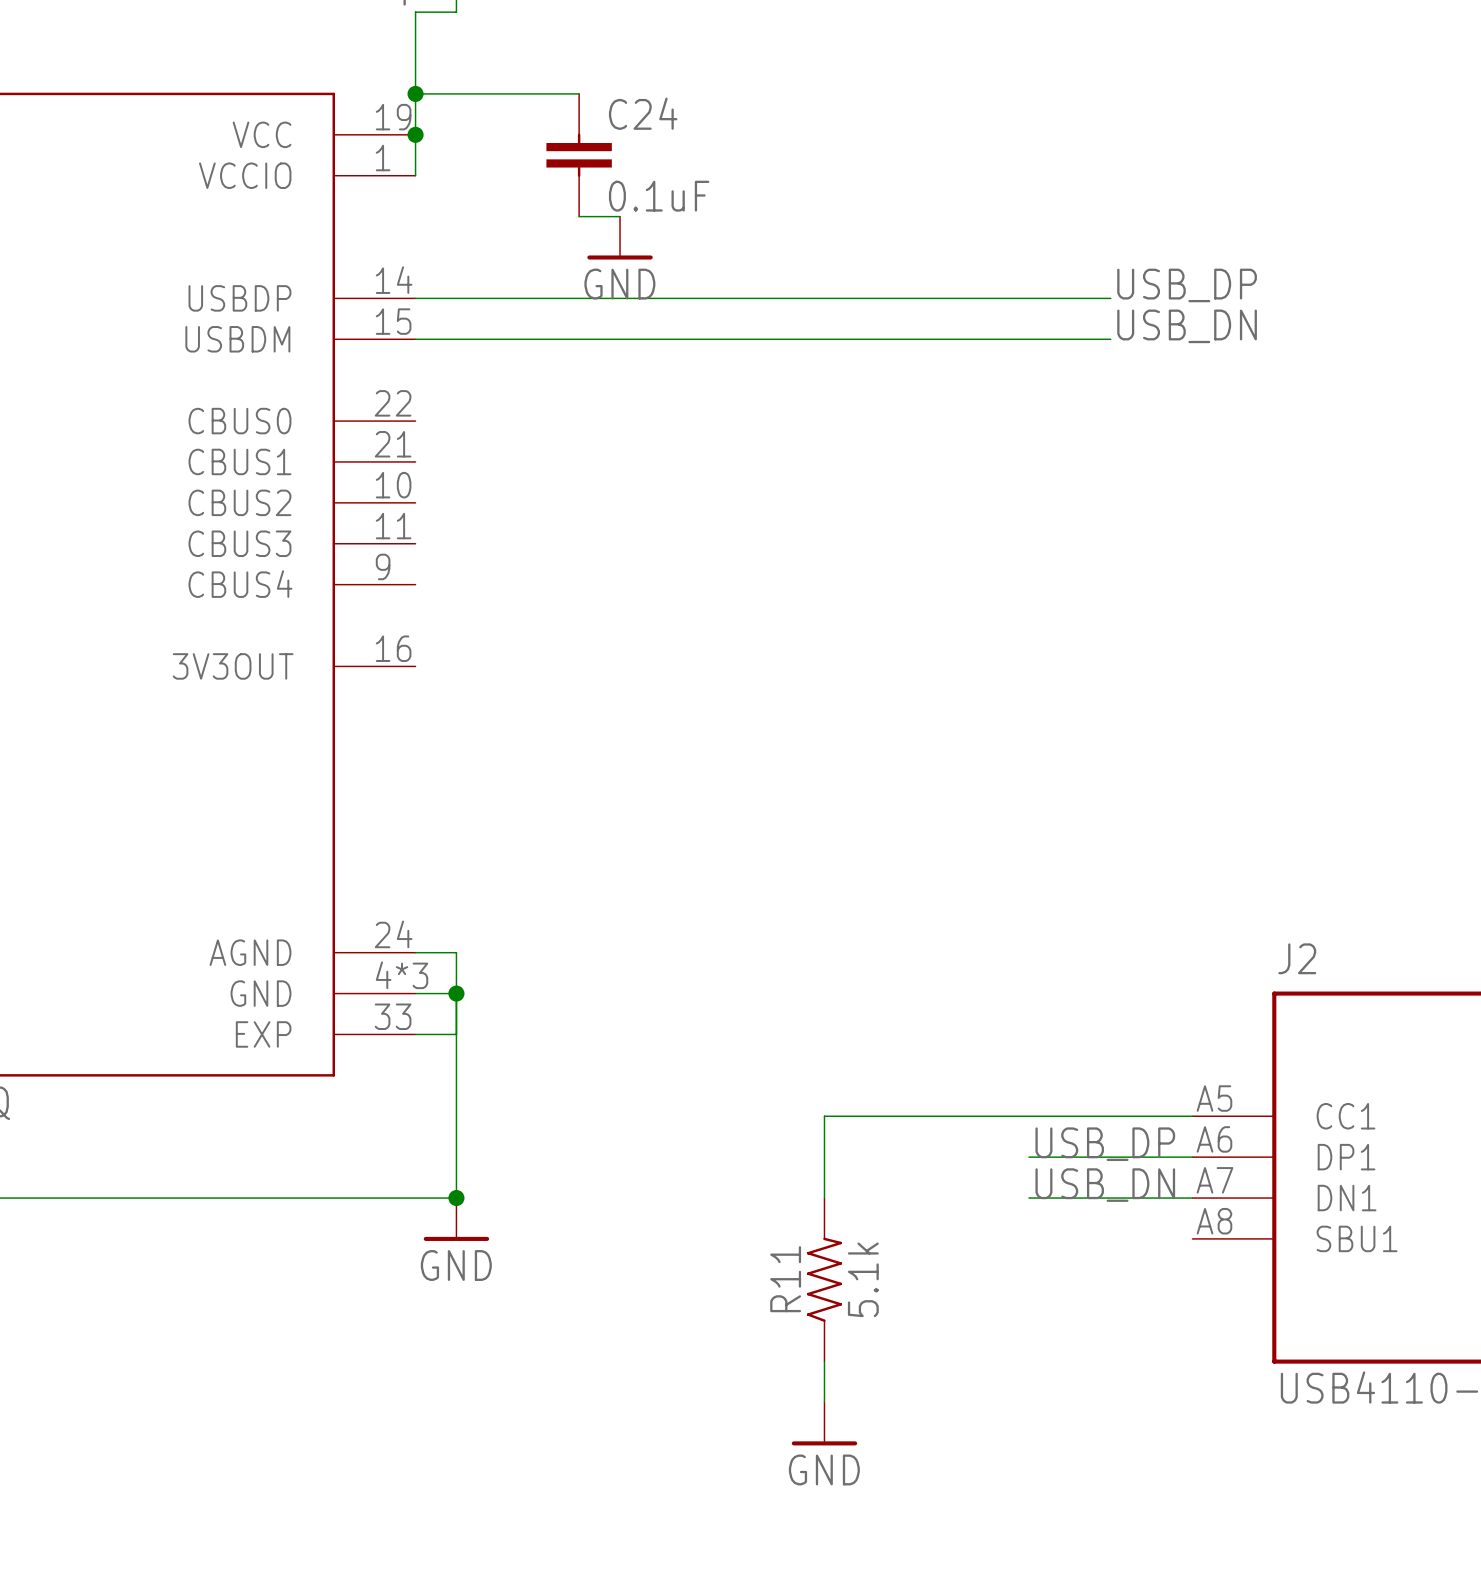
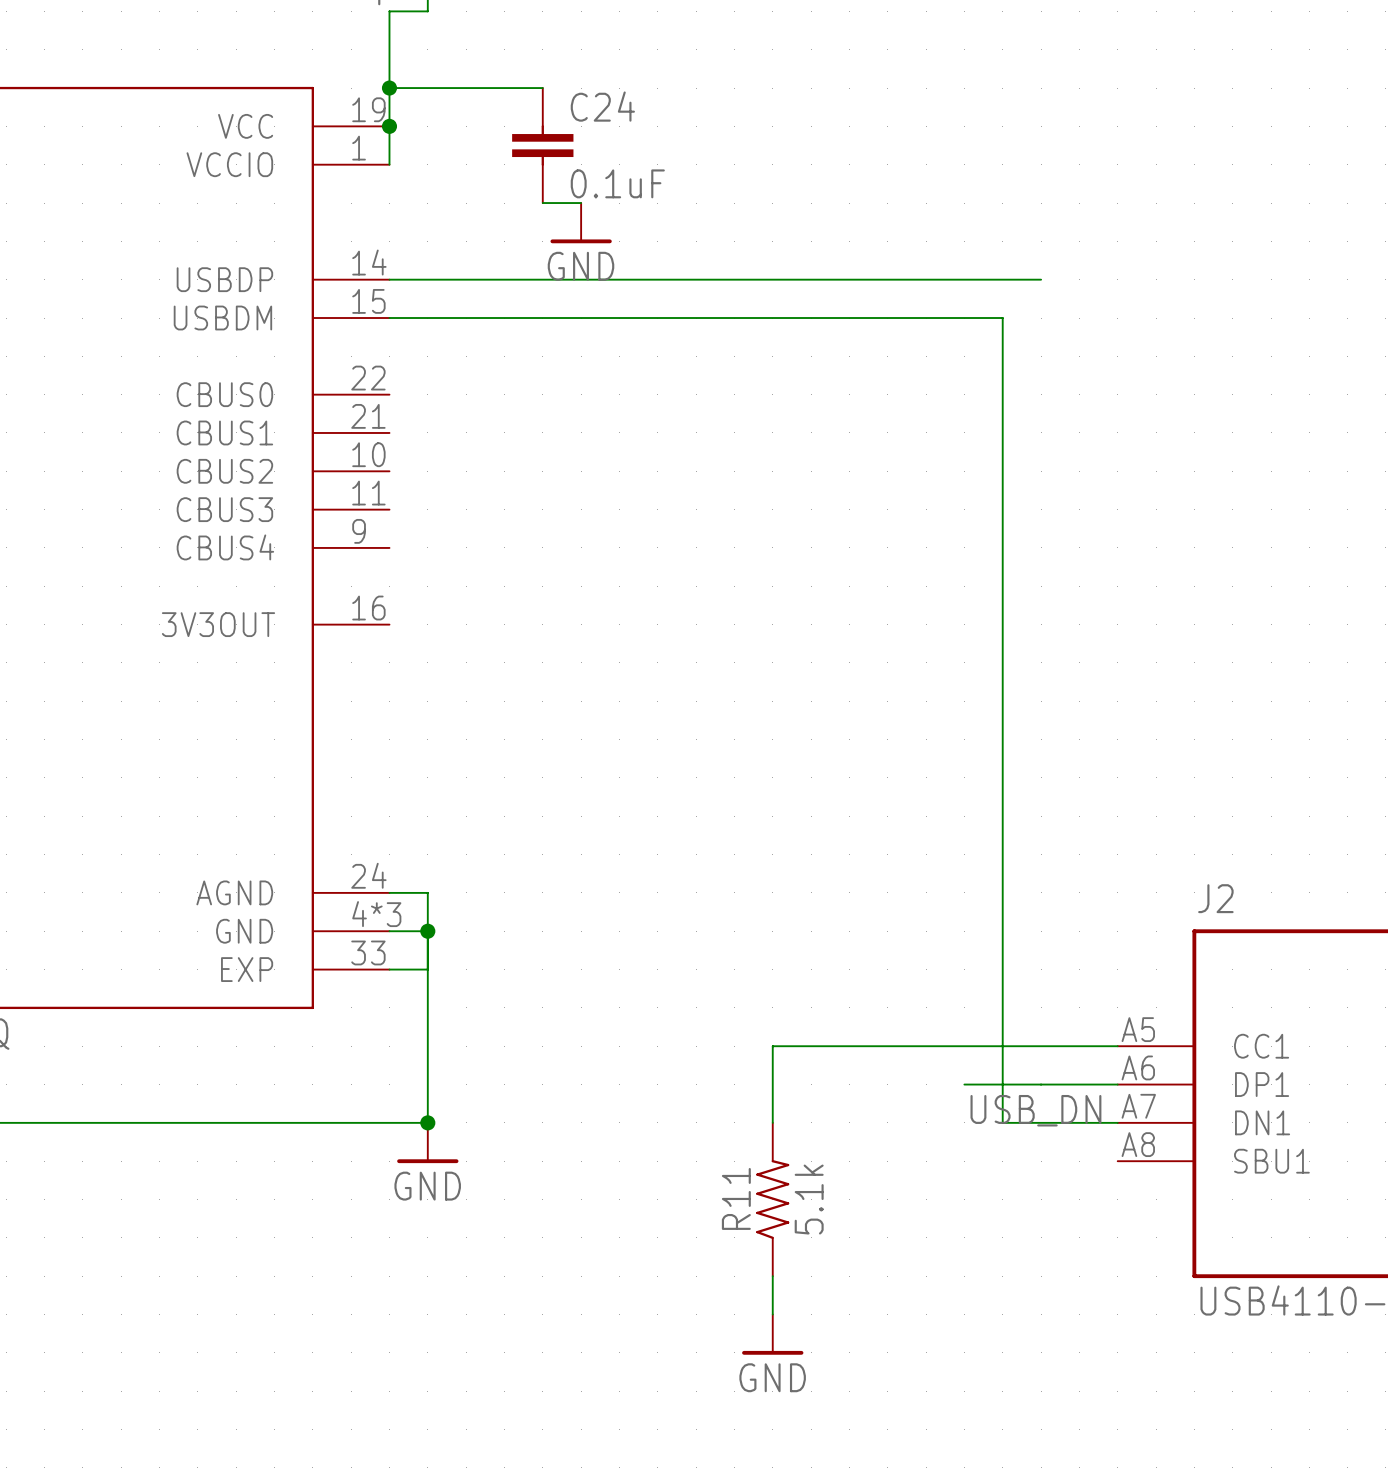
label: USB_DP (1187, 285) -> none
label: USB_DN (1187, 326) -> none
wire: (1069, 339) (1110, 339) -> (1002, 318) (1002, 1122)
label: USB_DP (1105, 1144) -> none
wire: (1028, 1198) (1069, 1198) -> none

